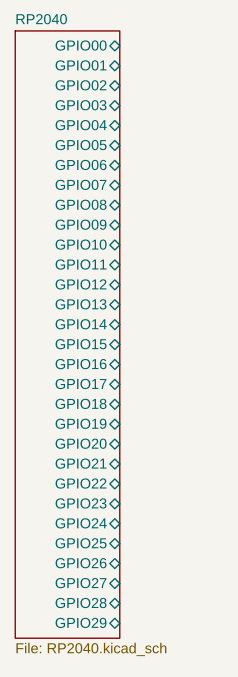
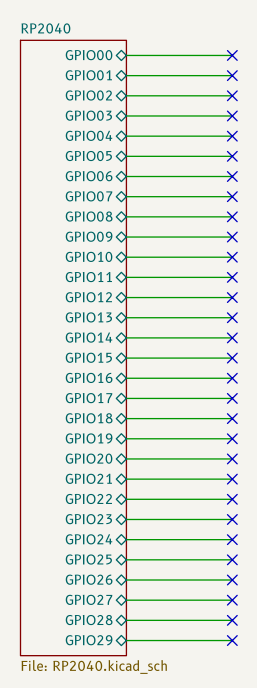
wire: none -> (126, 55) (232, 55)
no-connect mark: none -> (232, 55)
wire: none -> (126, 75) (232, 75)
no-connect mark: none -> (232, 75)
wire: none -> (126, 95) (232, 95)
no-connect mark: none -> (232, 95)
wire: none -> (126, 115) (232, 115)
no-connect mark: none -> (232, 115)
wire: none -> (126, 136) (232, 136)
no-connect mark: none -> (232, 136)
wire: none -> (126, 156) (232, 156)
no-connect mark: none -> (232, 156)
wire: none -> (126, 176) (232, 176)
no-connect mark: none -> (232, 176)
wire: none -> (126, 196) (232, 196)
no-connect mark: none -> (232, 196)
wire: none -> (126, 216) (232, 216)
no-connect mark: none -> (232, 216)
wire: none -> (126, 237) (232, 237)
no-connect mark: none -> (232, 237)
wire: none -> (126, 257) (232, 257)
no-connect mark: none -> (232, 257)
wire: none -> (126, 277) (232, 277)
no-connect mark: none -> (232, 277)
wire: none -> (126, 297) (232, 297)
no-connect mark: none -> (232, 297)
wire: none -> (126, 317) (232, 317)
no-connect mark: none -> (232, 317)
wire: none -> (126, 337) (232, 337)
no-connect mark: none -> (232, 337)
wire: none -> (126, 358) (232, 358)
no-connect mark: none -> (232, 358)
wire: none -> (126, 378) (232, 378)
no-connect mark: none -> (232, 378)
wire: none -> (126, 398) (232, 398)
no-connect mark: none -> (232, 398)
wire: none -> (126, 418) (232, 418)
no-connect mark: none -> (232, 418)
wire: none -> (126, 438) (232, 438)
no-connect mark: none -> (232, 438)
wire: none -> (126, 458) (232, 458)
no-connect mark: none -> (232, 458)
wire: none -> (126, 479) (232, 479)
no-connect mark: none -> (232, 479)
wire: none -> (126, 499) (232, 499)
no-connect mark: none -> (232, 499)
wire: none -> (126, 519) (232, 519)
no-connect mark: none -> (232, 519)
wire: none -> (126, 539) (232, 539)
no-connect mark: none -> (232, 539)
wire: none -> (126, 559) (232, 559)
no-connect mark: none -> (232, 559)
wire: none -> (126, 580) (232, 580)
no-connect mark: none -> (232, 580)
wire: none -> (126, 600) (232, 600)
no-connect mark: none -> (232, 600)
wire: none -> (126, 620) (232, 620)
no-connect mark: none -> (232, 620)
wire: none -> (126, 640) (232, 640)
no-connect mark: none -> (232, 640)

